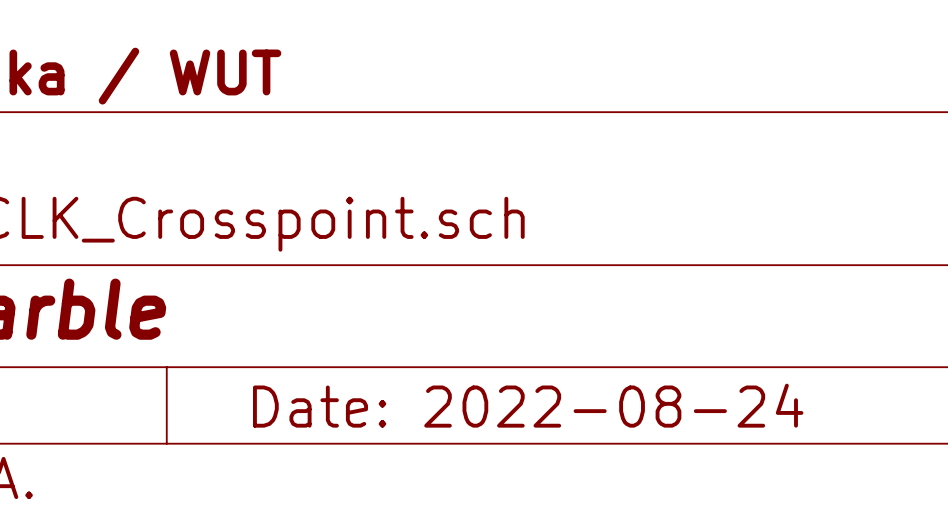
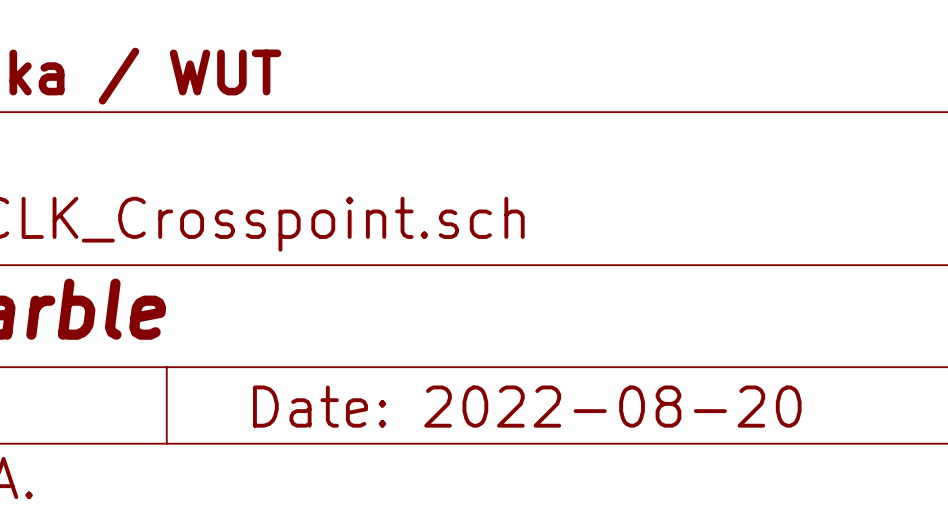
title block: Date: 2022-08-24 (528, 405) -> Date: 2022-08-20 (527, 406)

